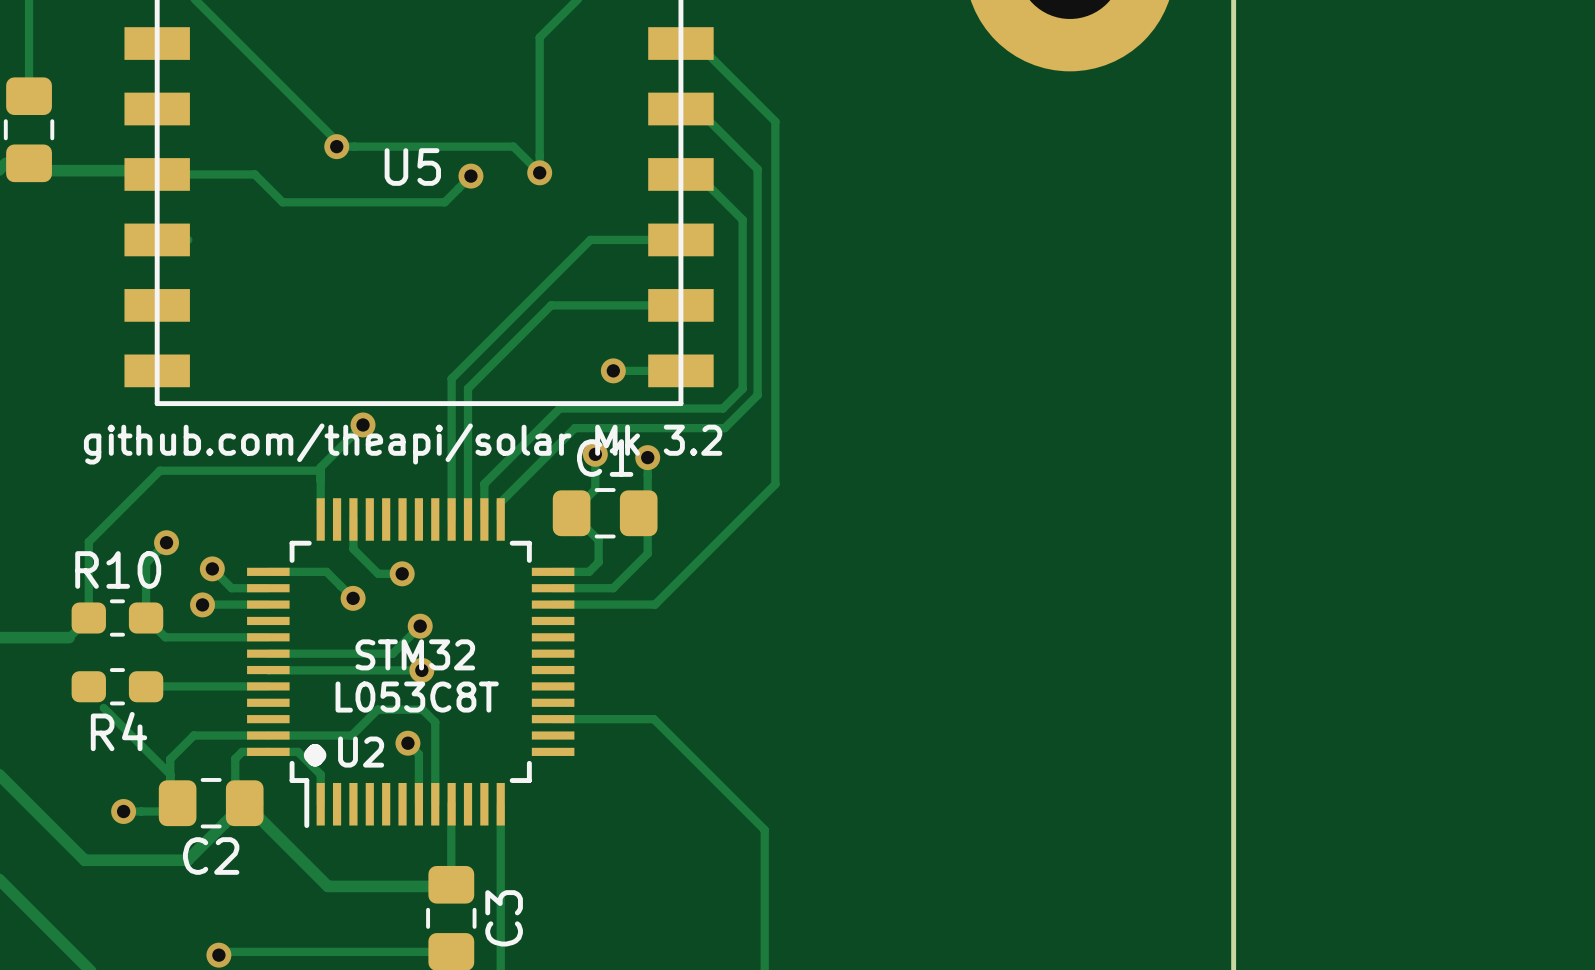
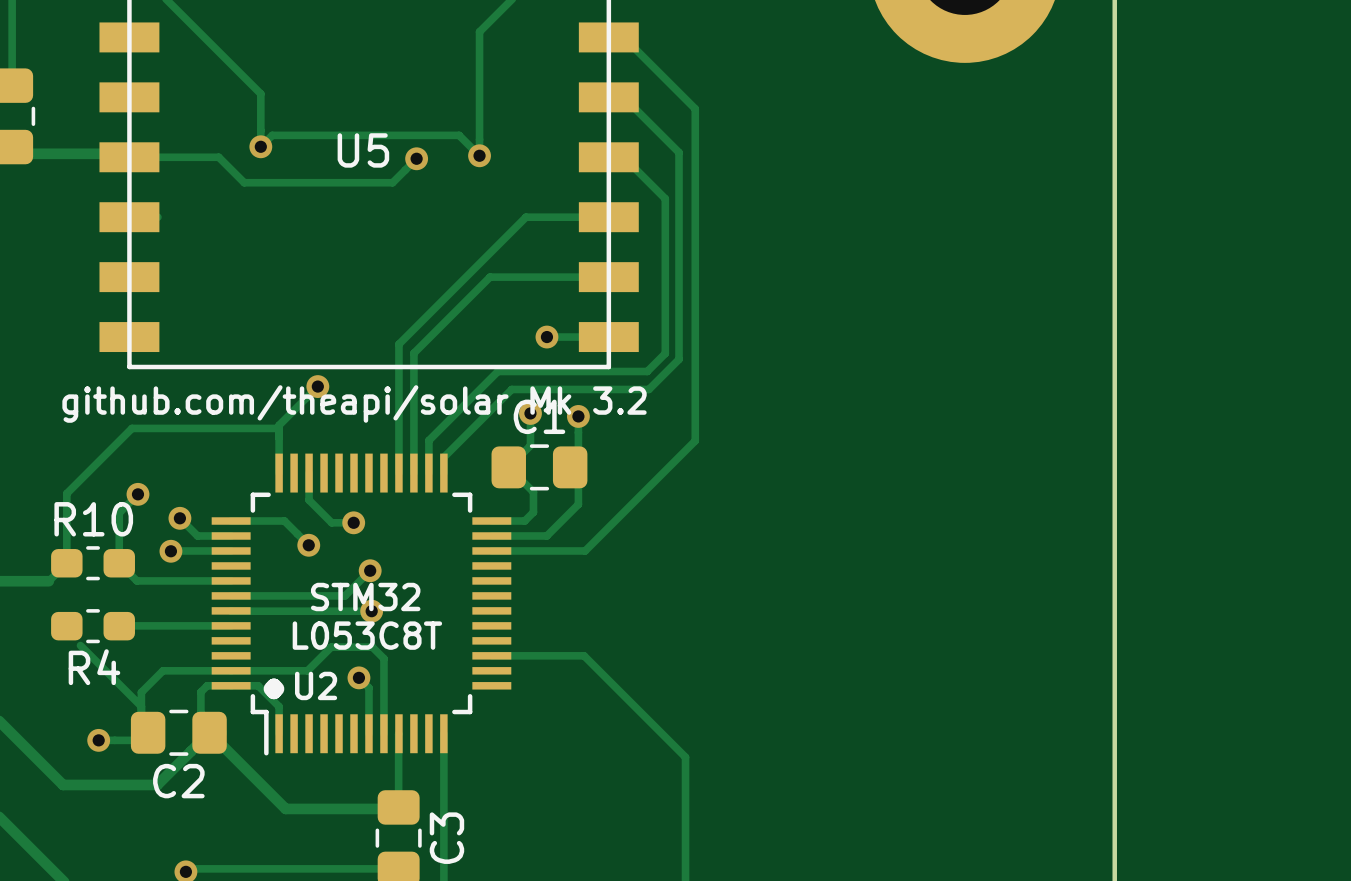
track: (300, 105) (336, 141) (336, 146) (513, 146) (517, 150) -> (260, 93) (260, 146) (272, 135) (459, 135)
via position: (336, 146) -> (260, 146)

